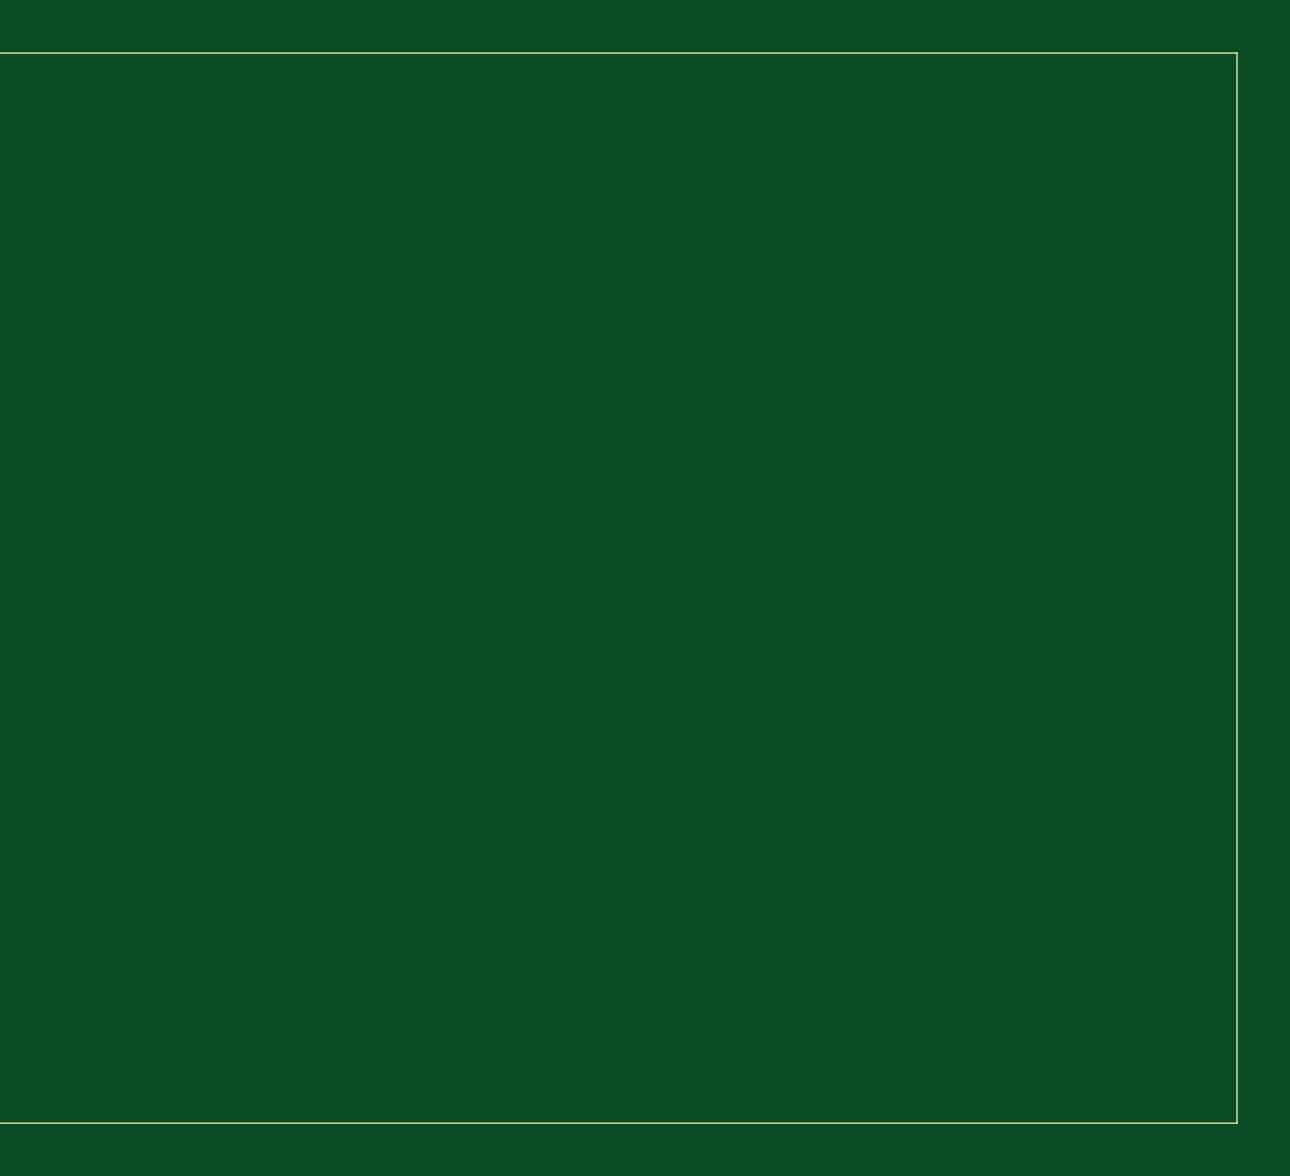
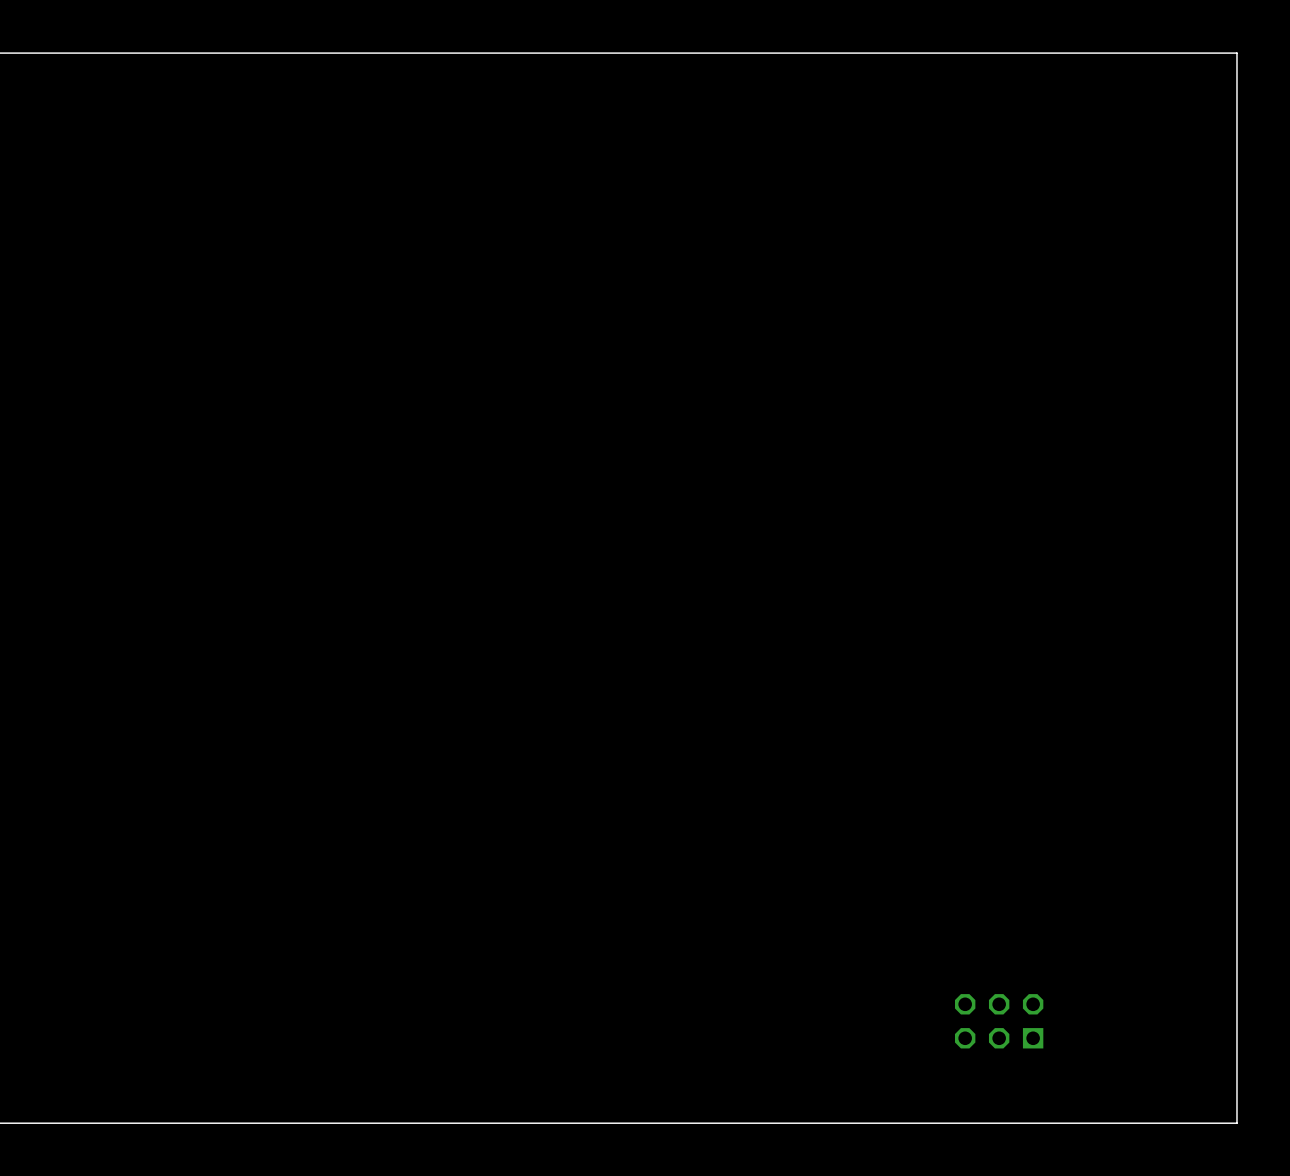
part: none -> (999, 1021)

